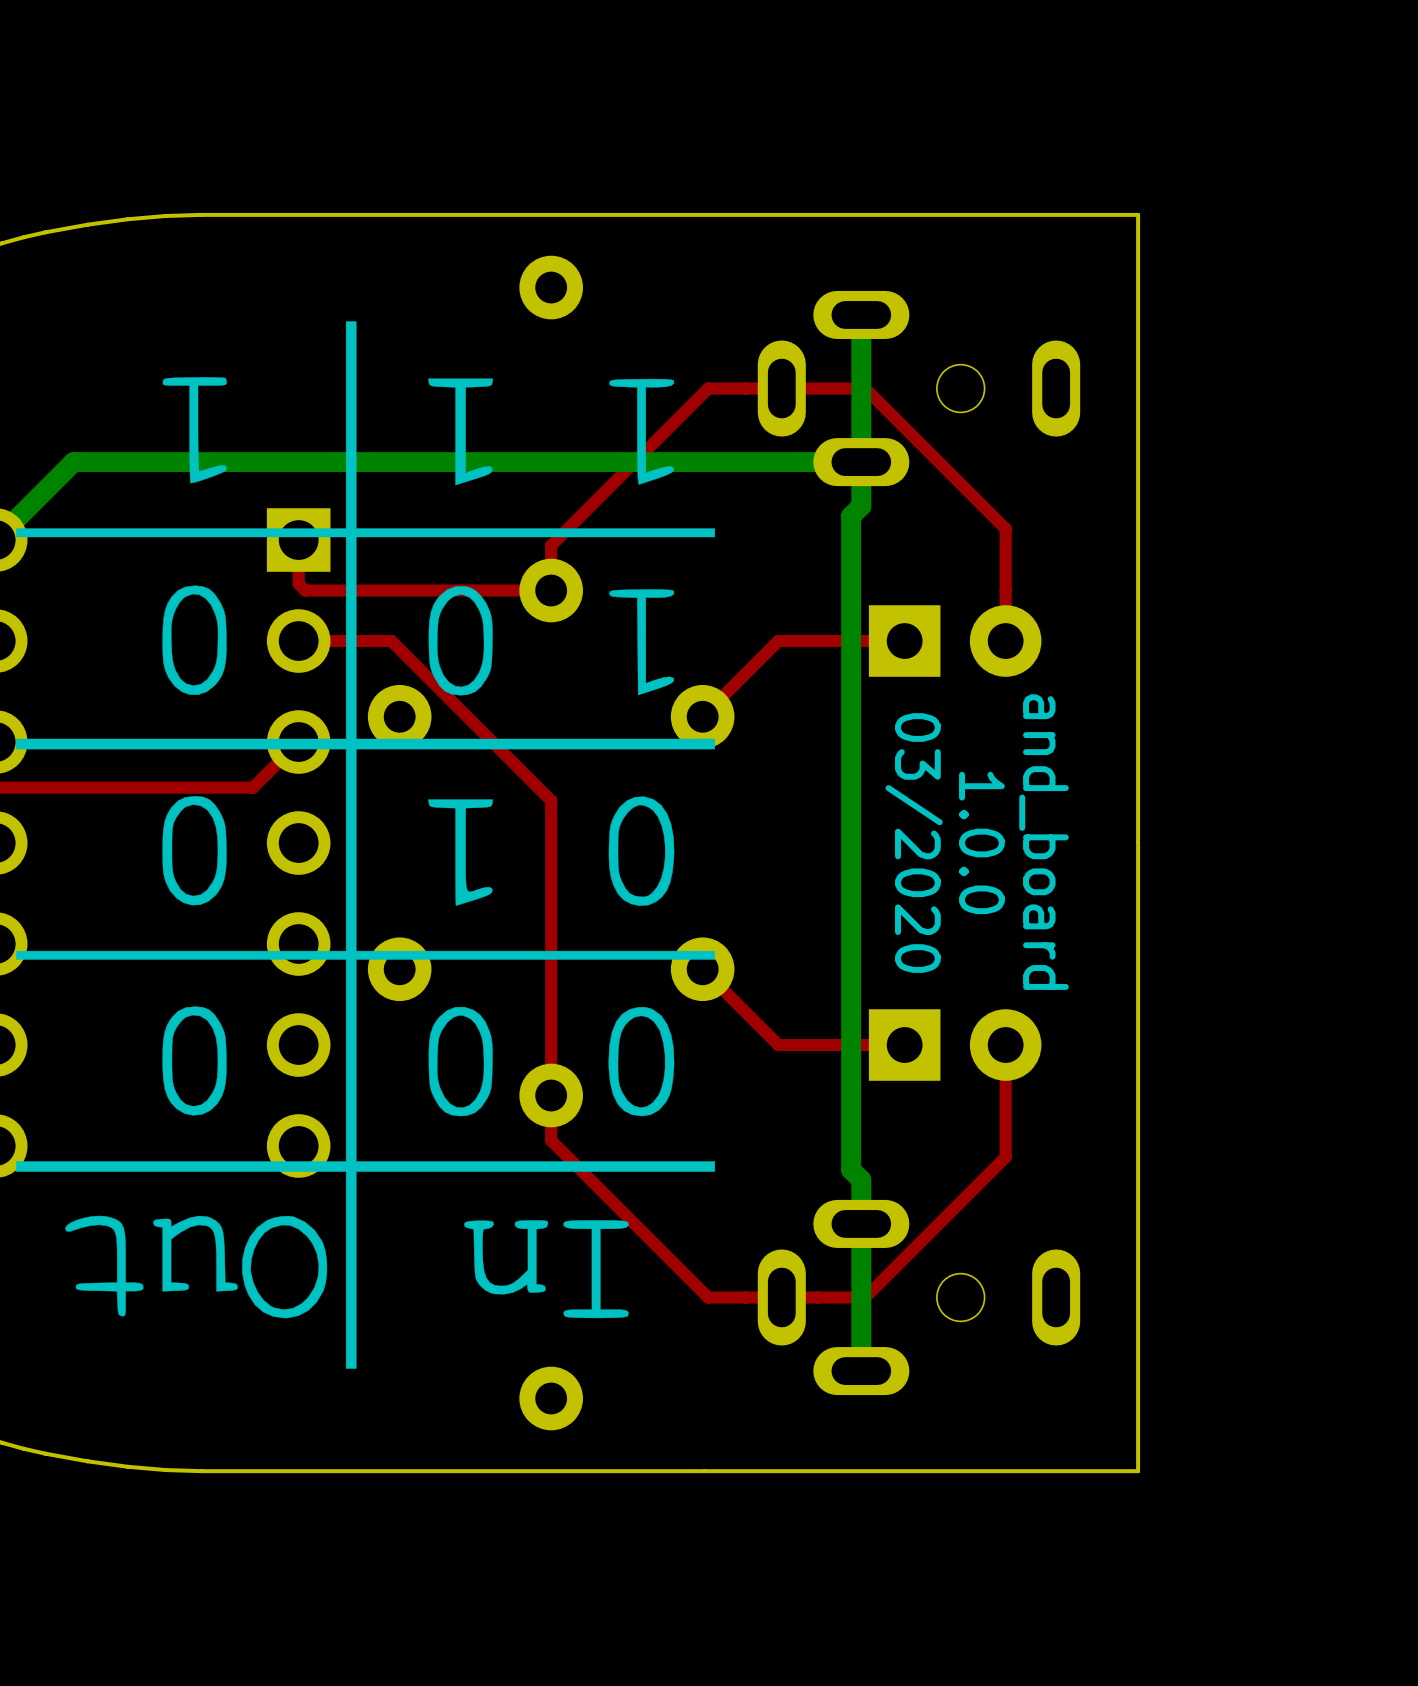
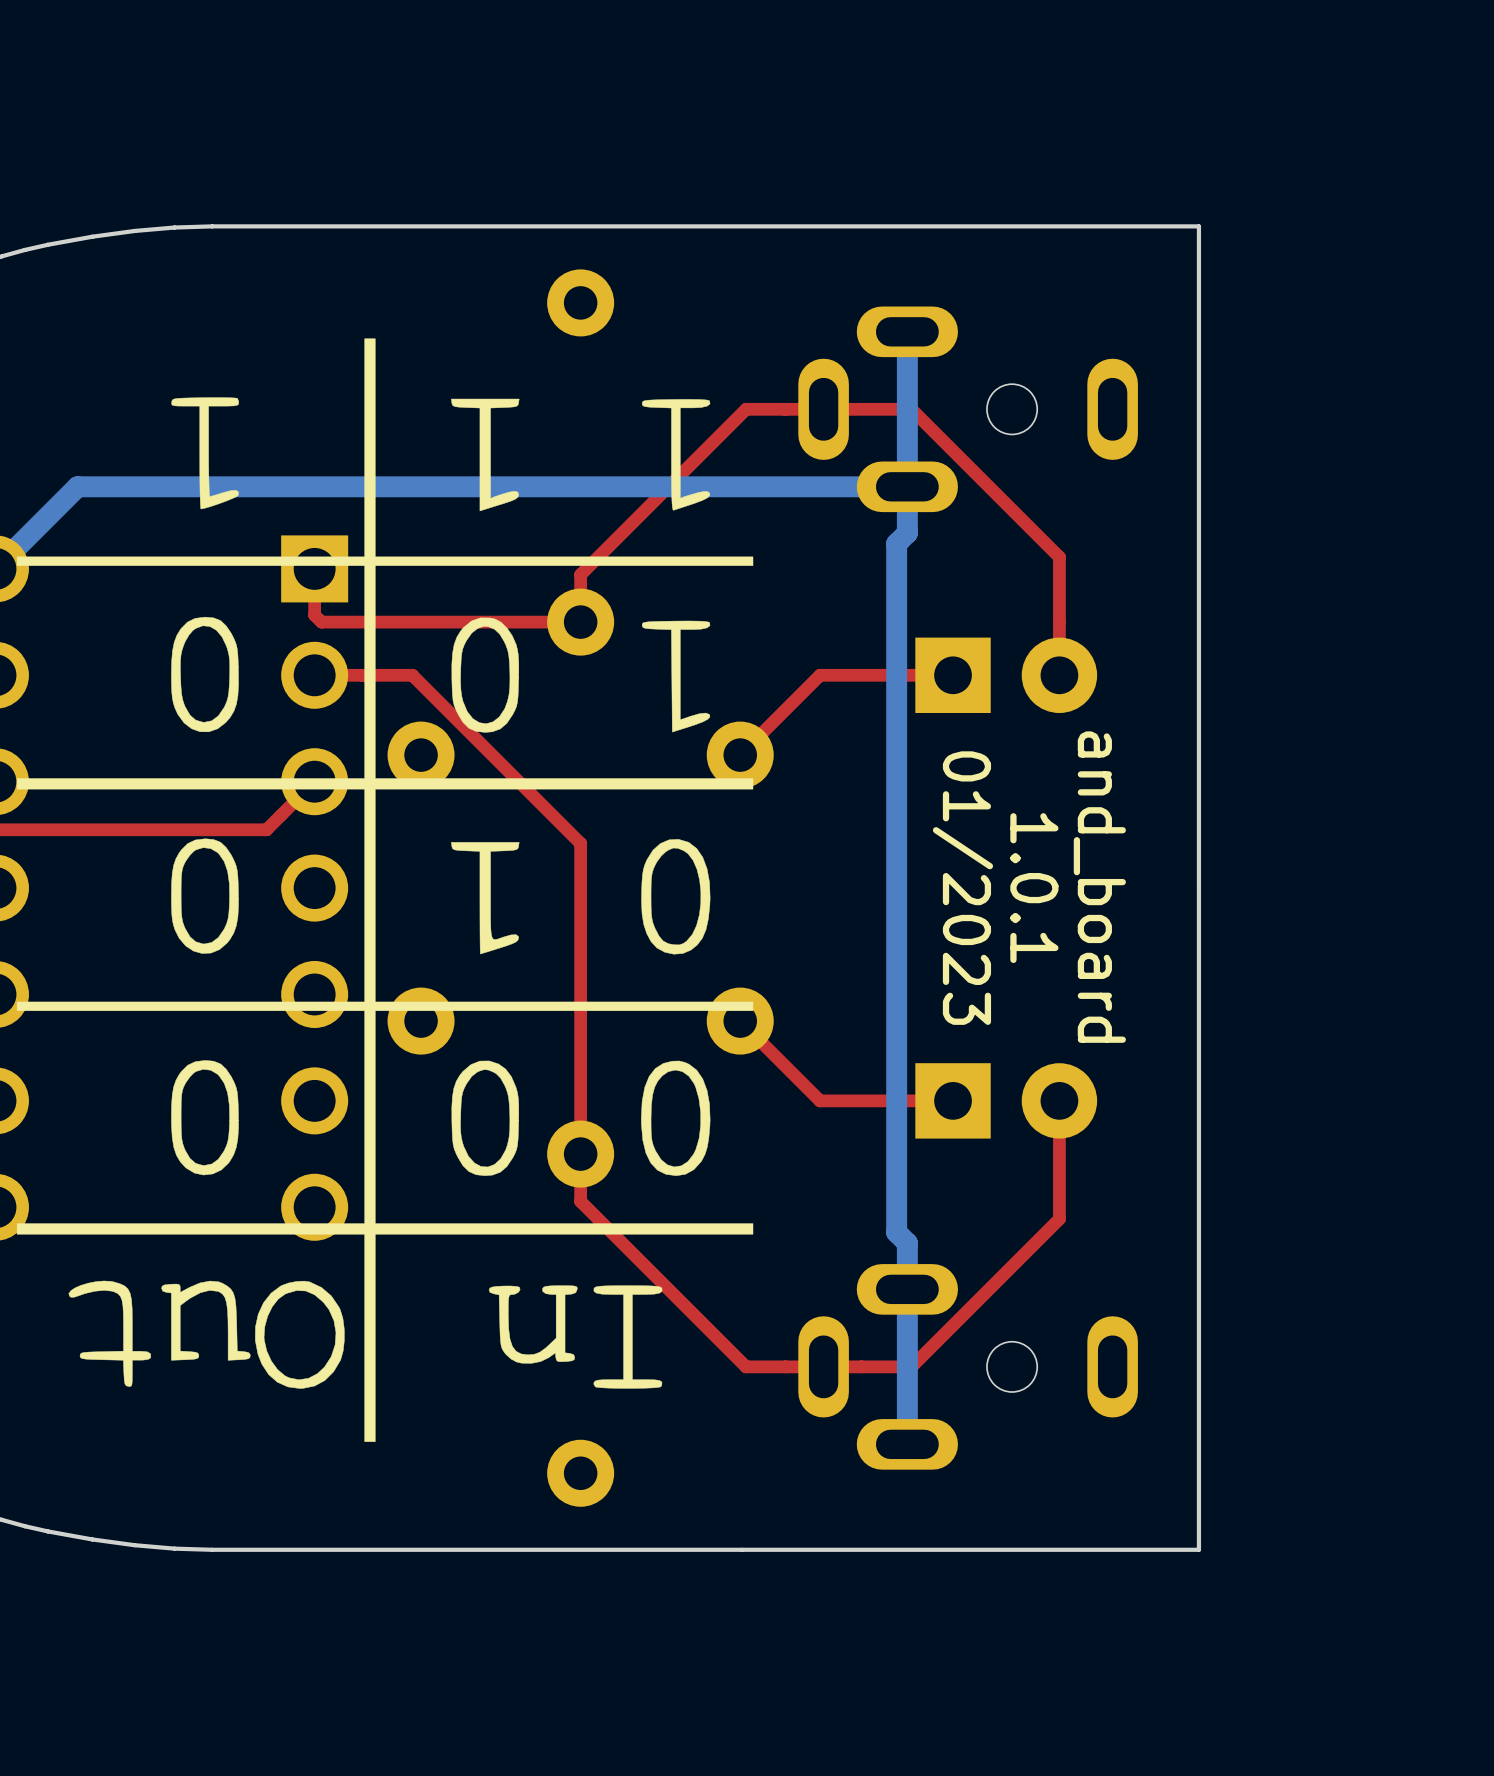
text: 03/2020 (914, 843) -> 01/2023 (962, 888)
text: 1.0.0 (981, 843) -> 1.0.1 (1034, 888)

